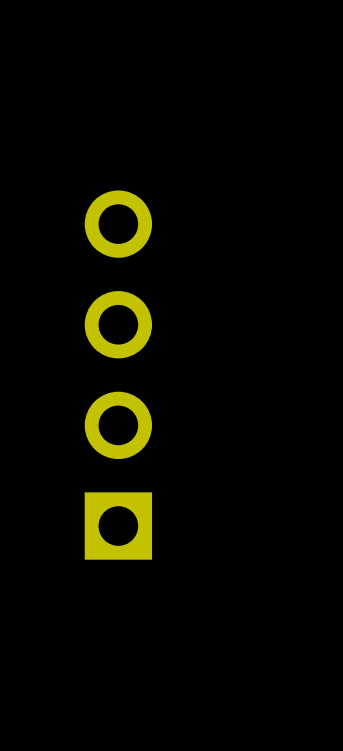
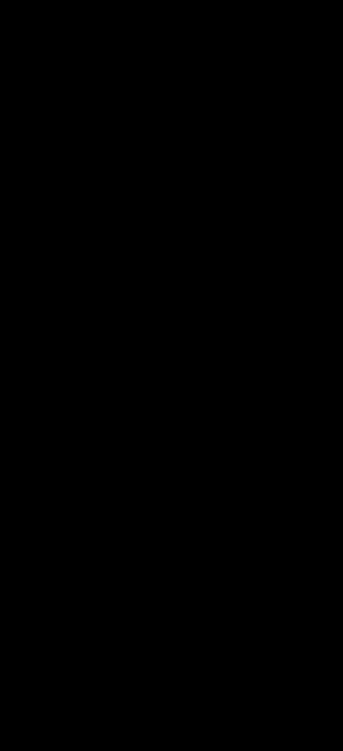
part: (118, 375) -> none

